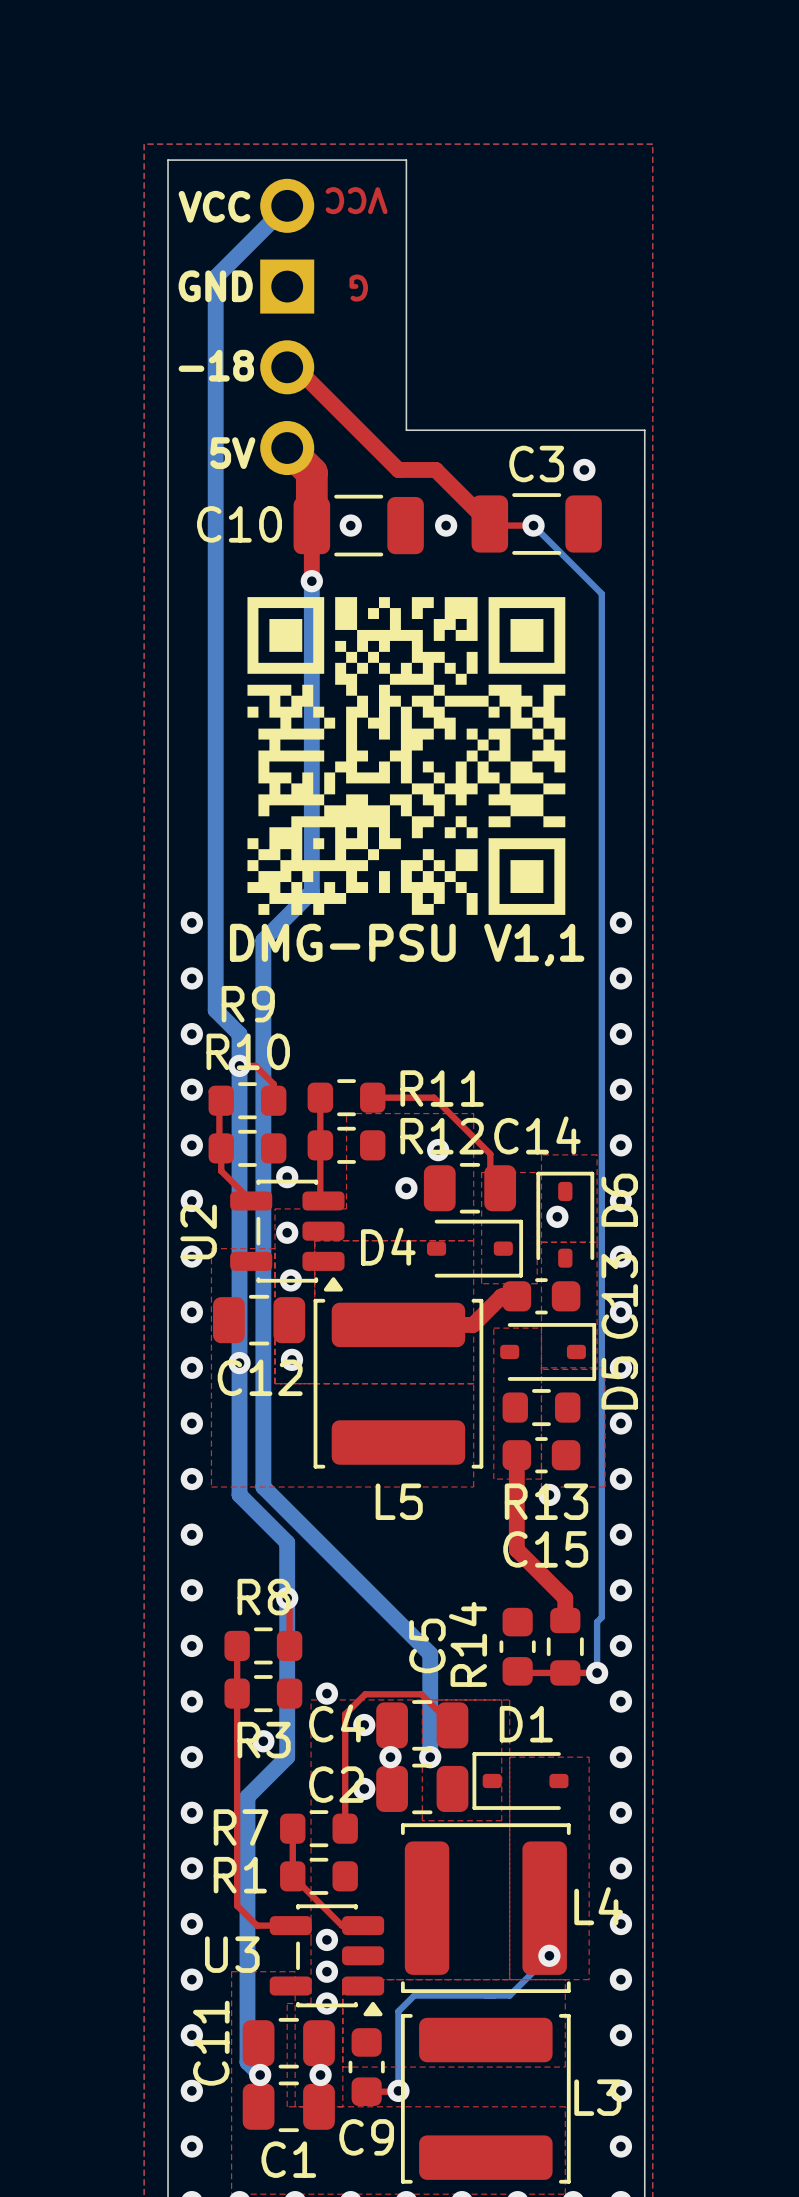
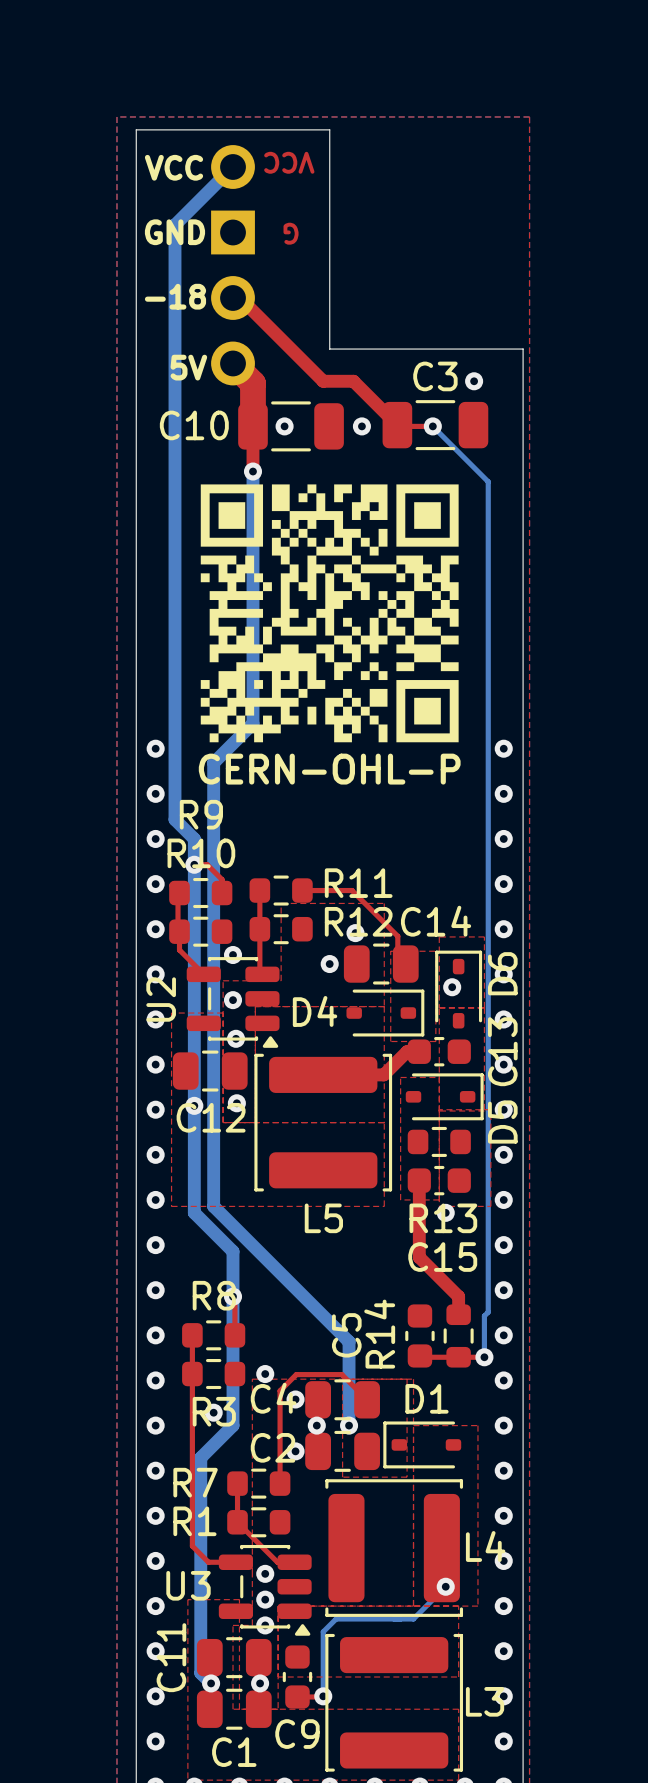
text: DMG-PSU V1,1 (407, 945) -> CERN-OHL-P (329, 769)

